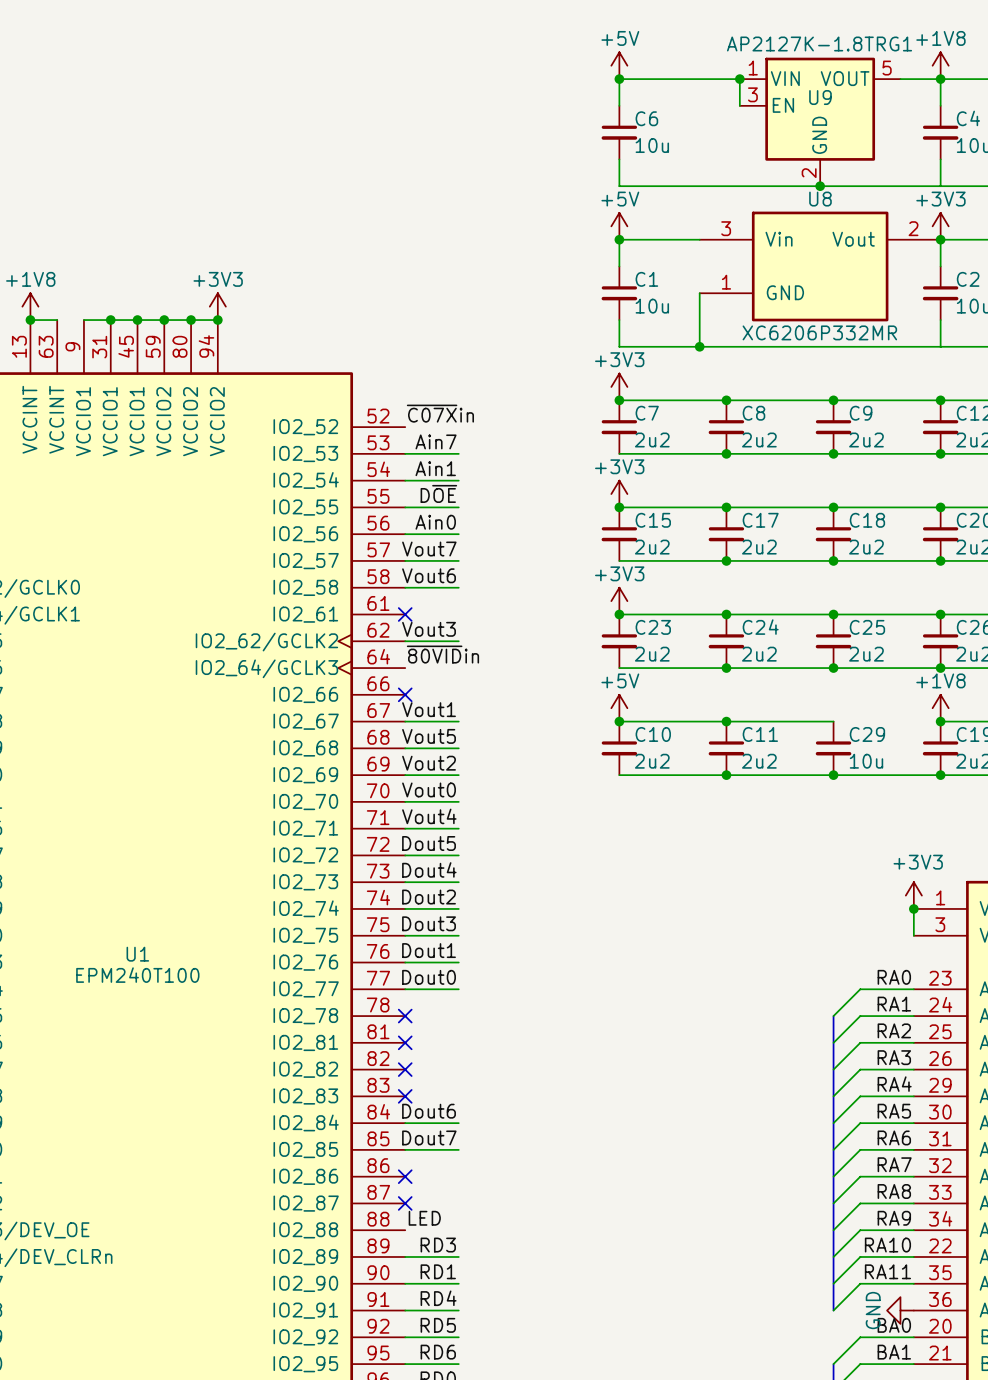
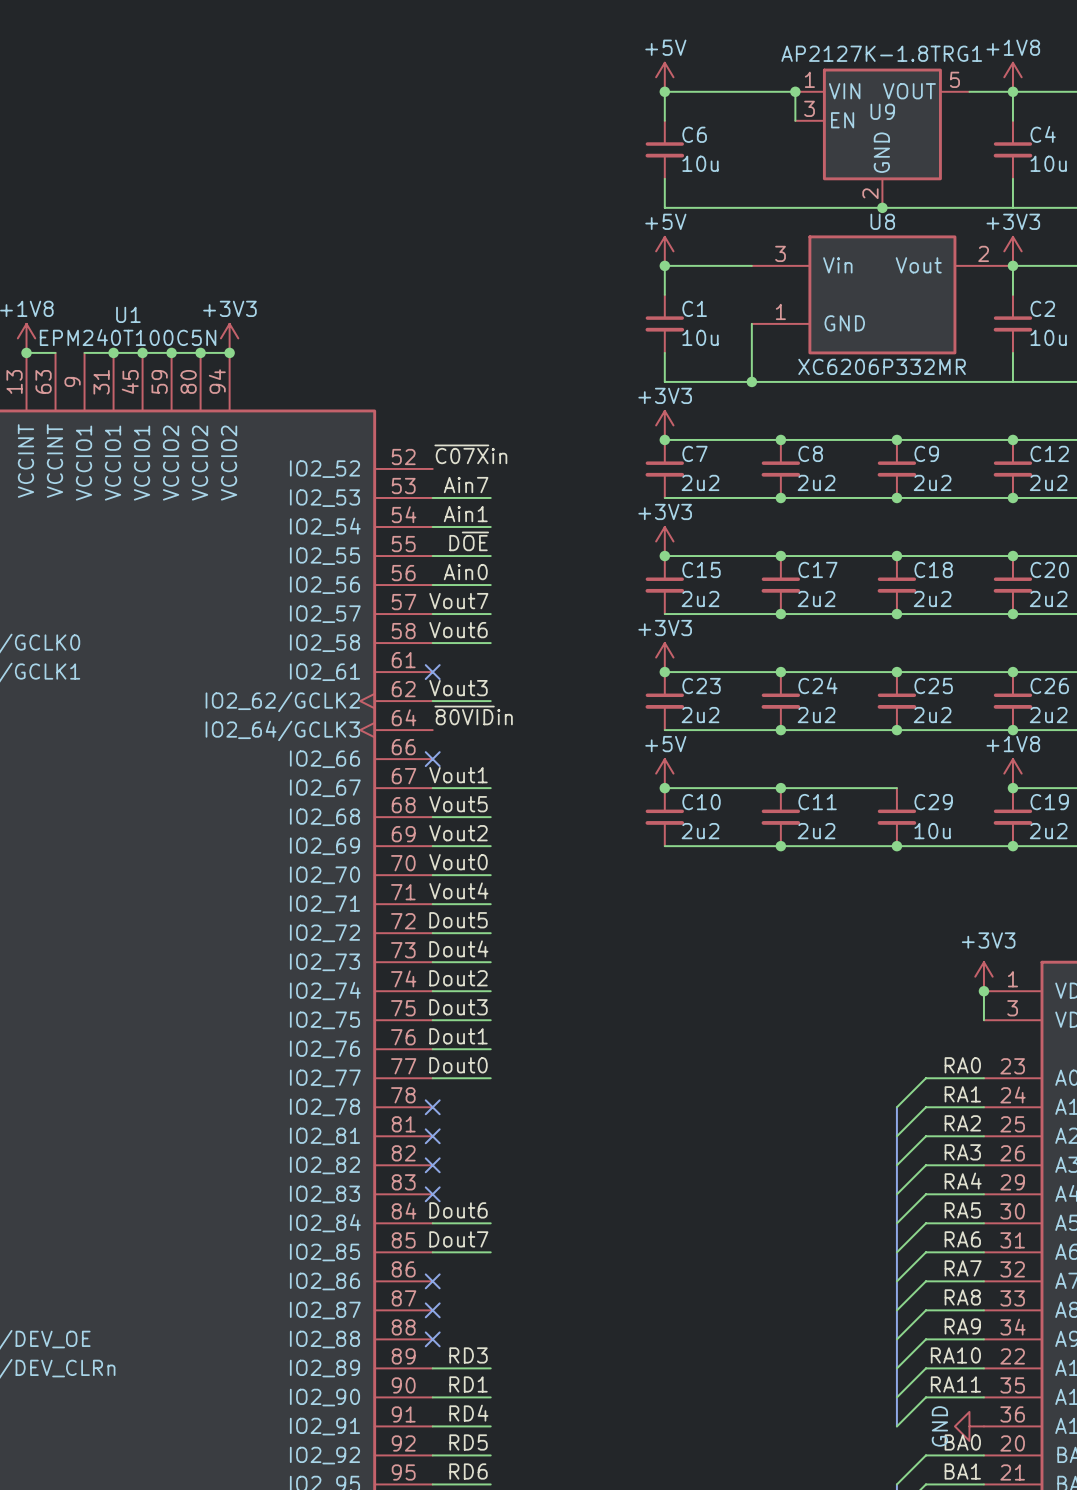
U1 name position: U1 (137, 954) -> U1 (128, 314)
U1 value: EPM240T100 (137, 975) -> EPM240T100C5N (128, 337)
label: LED (424, 1218) -> none
no-connect mark: none -> (432, 1339)

